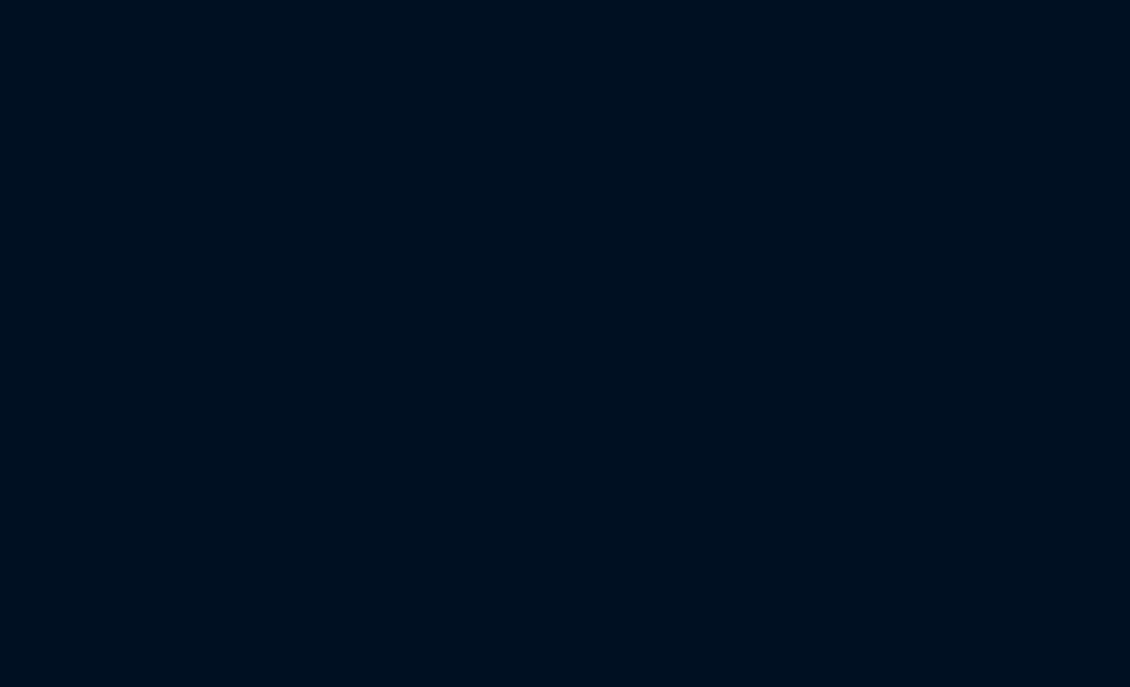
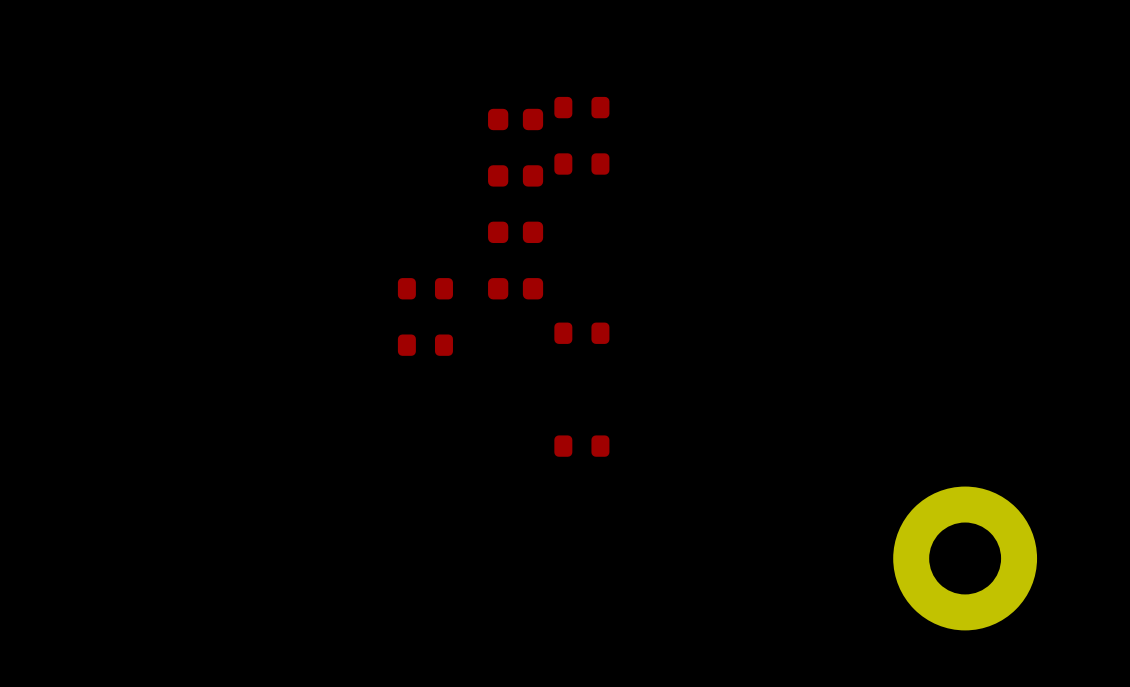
part: none -> (581, 107)
part: none -> (515, 119)
part: none -> (581, 164)
part: none -> (515, 175)
part: none -> (515, 232)
part: none -> (425, 288)
part: none -> (515, 288)
part: none -> (581, 333)
part: none -> (425, 345)
part: none -> (581, 446)
part: none -> (965, 558)

